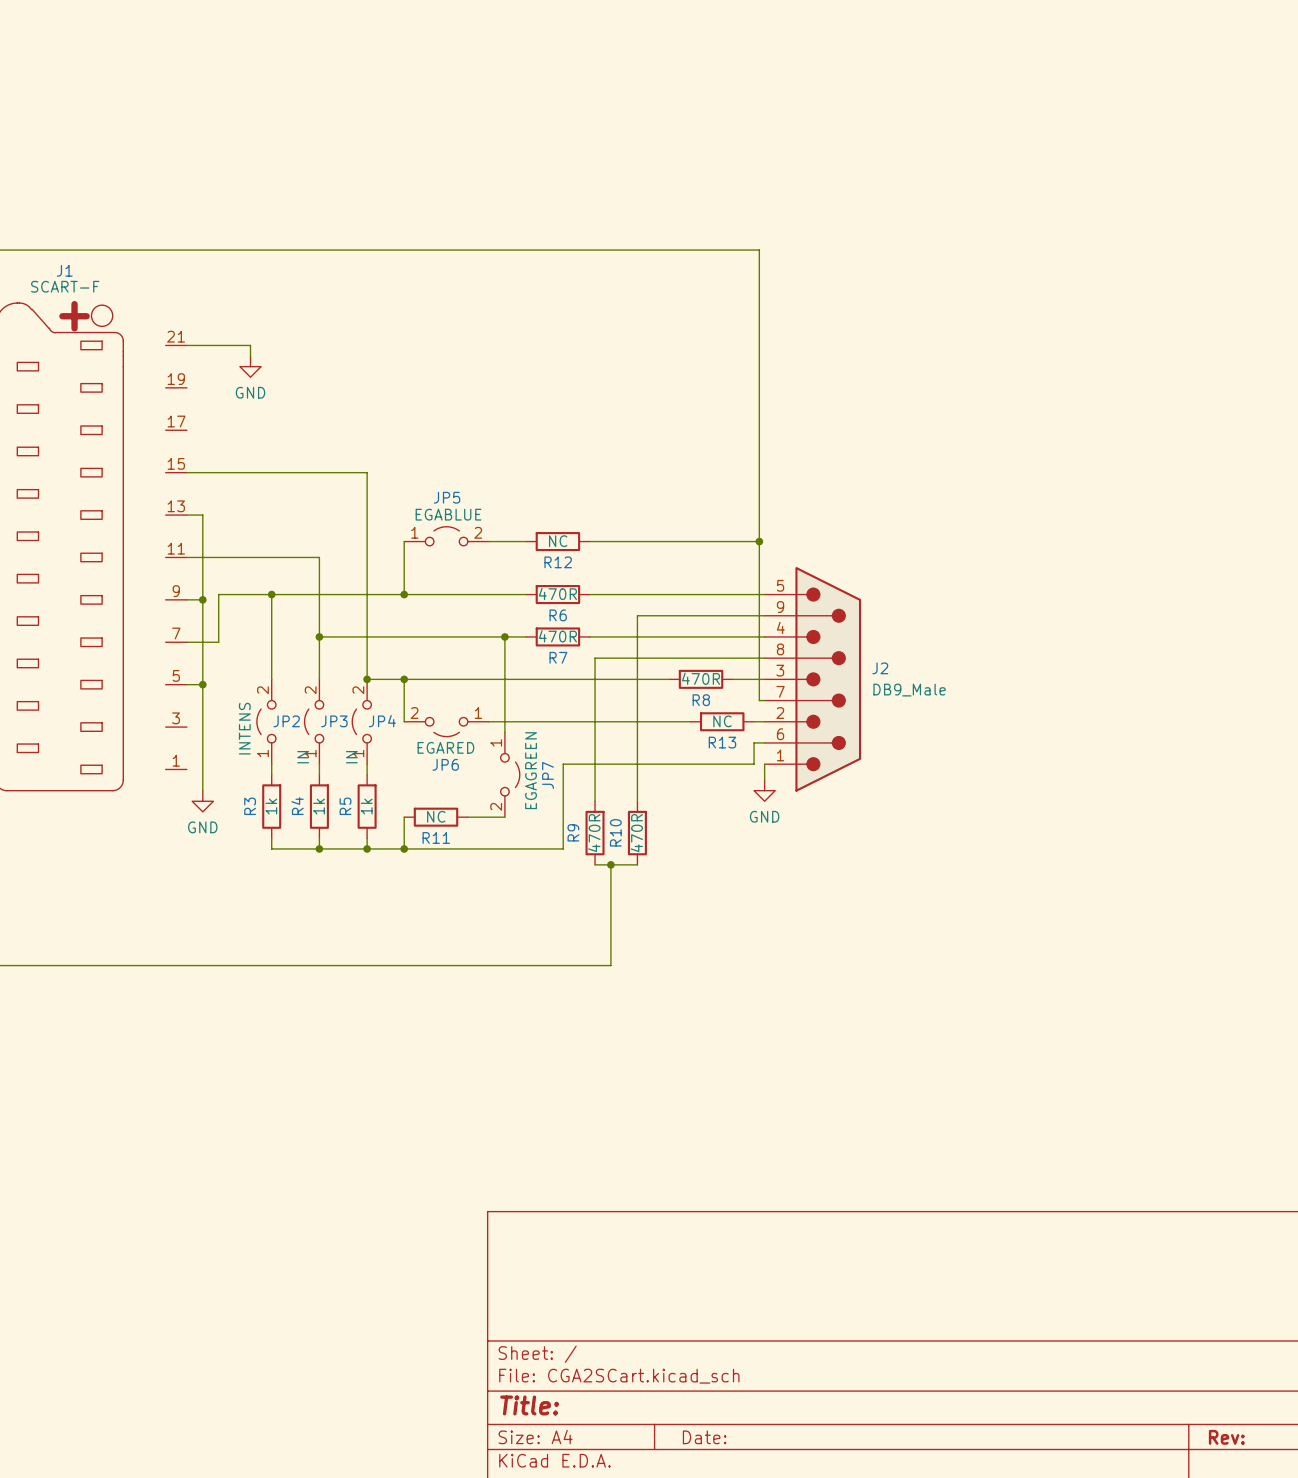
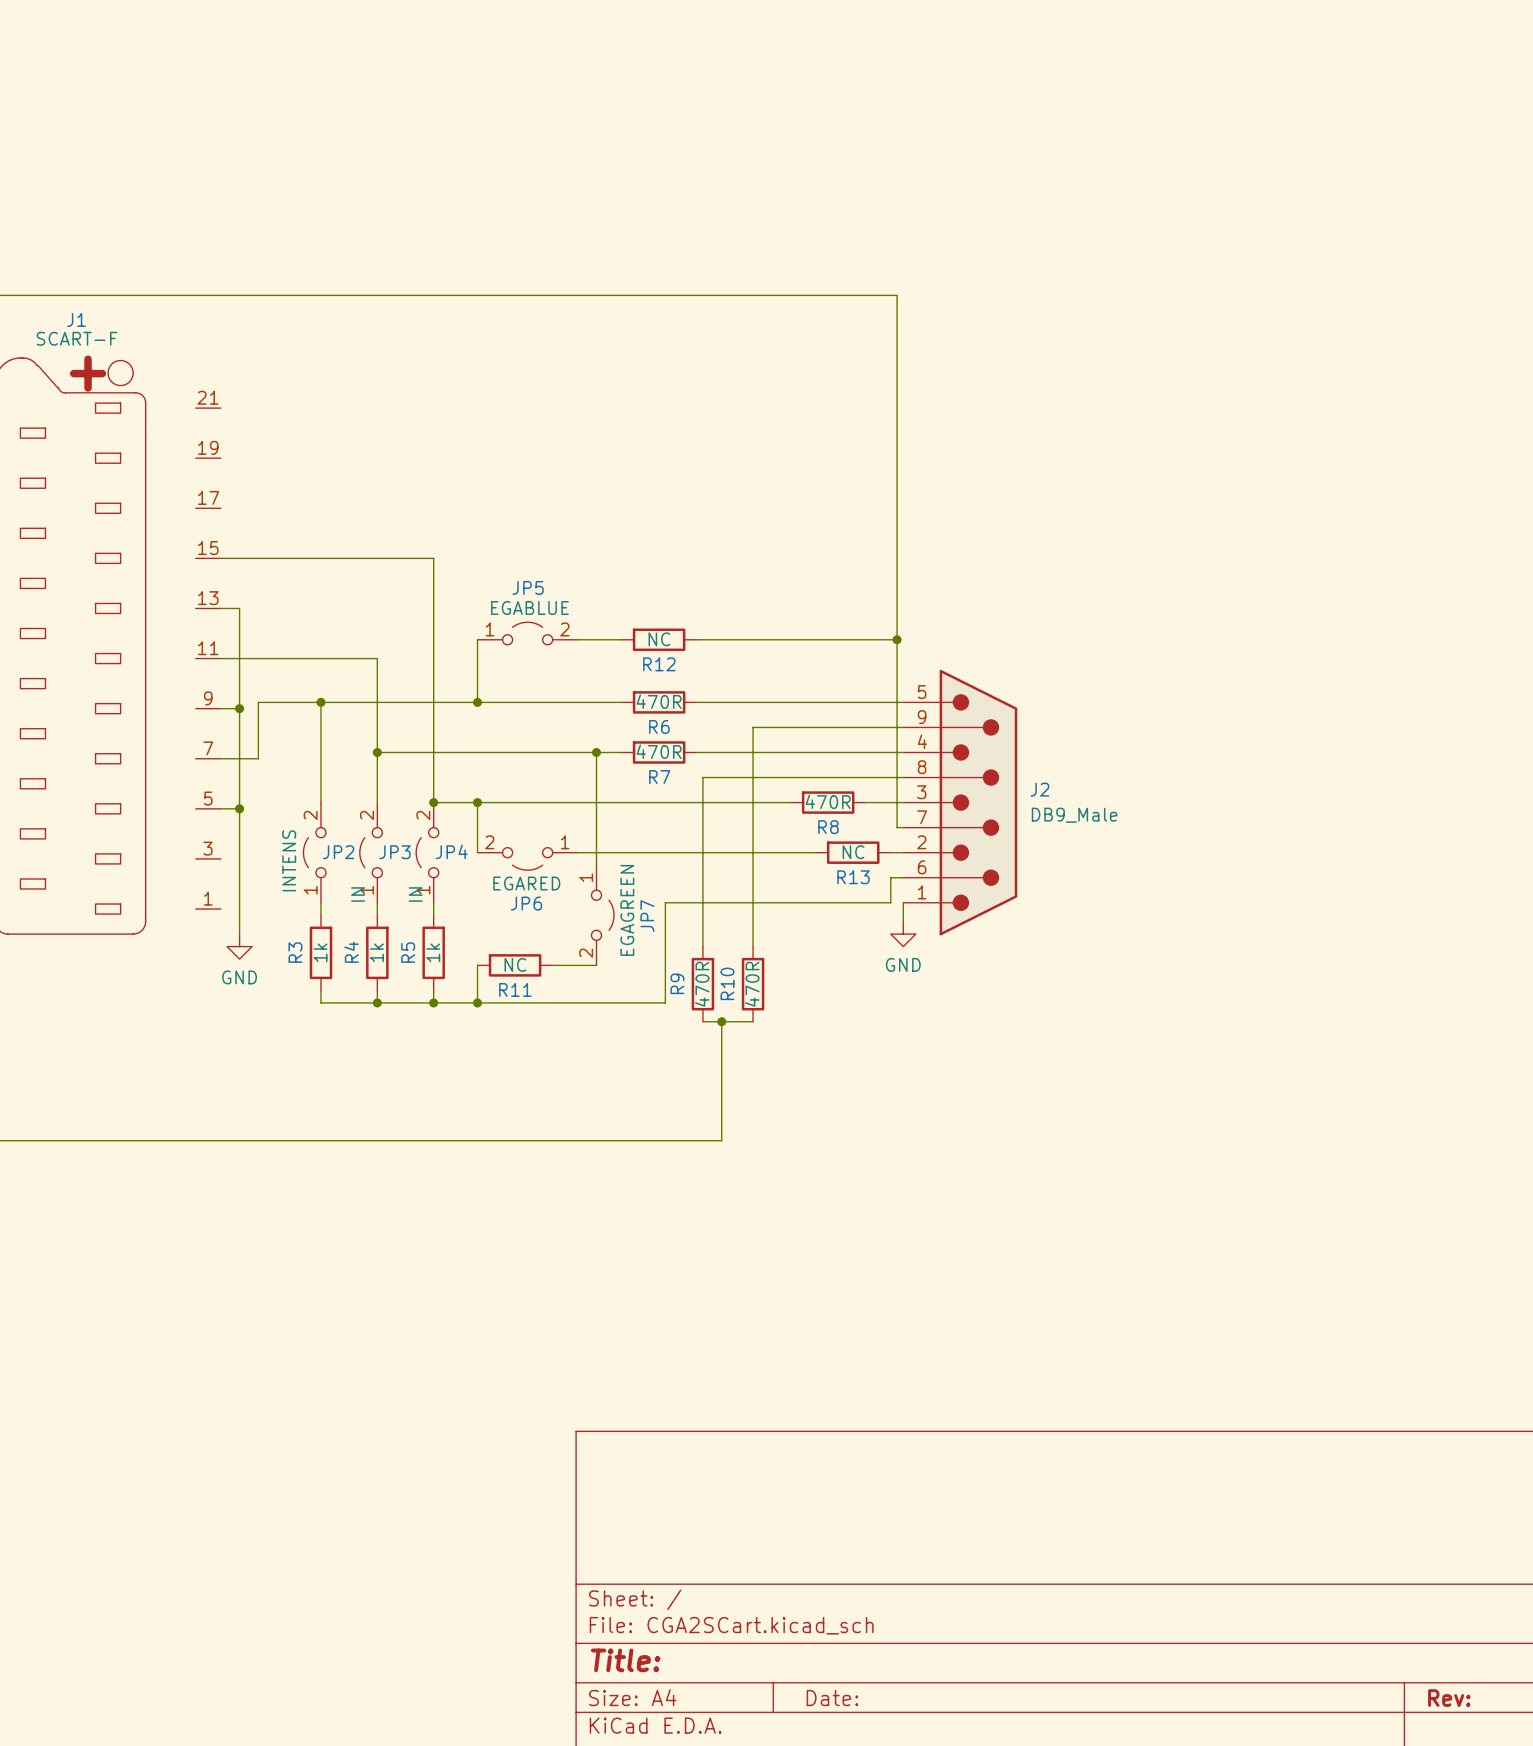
wire: (186, 345) (250, 345) (250, 356) -> none
power symbol: GND (250, 366) -> none

